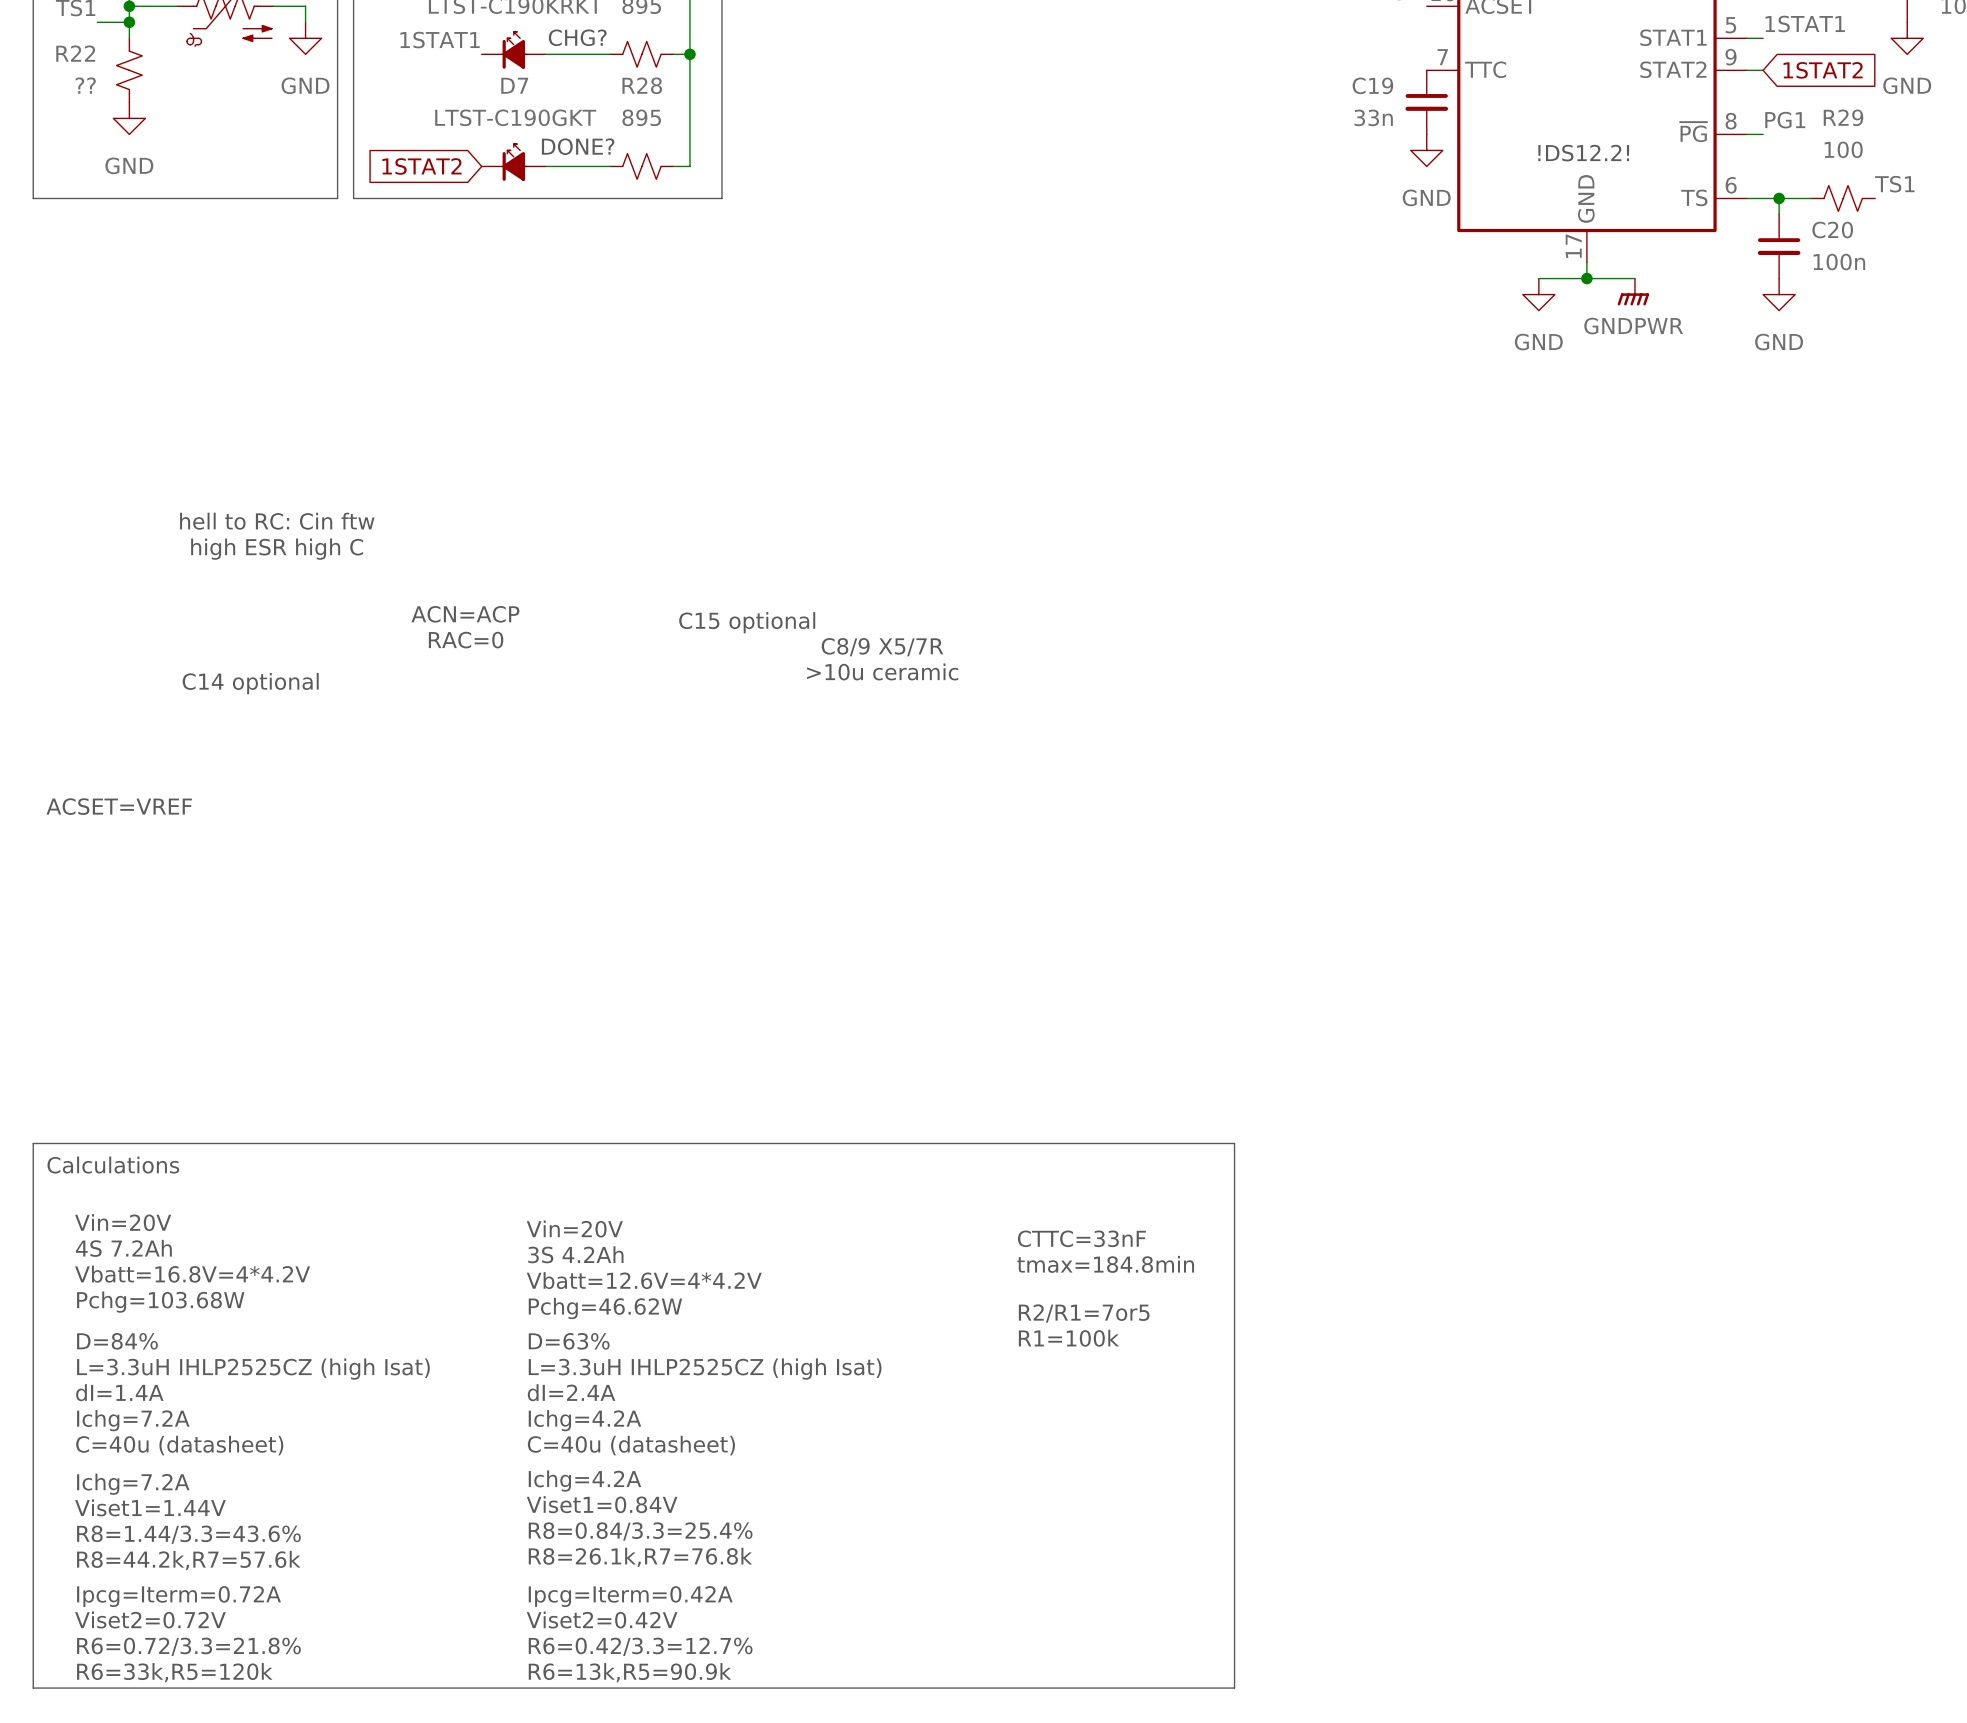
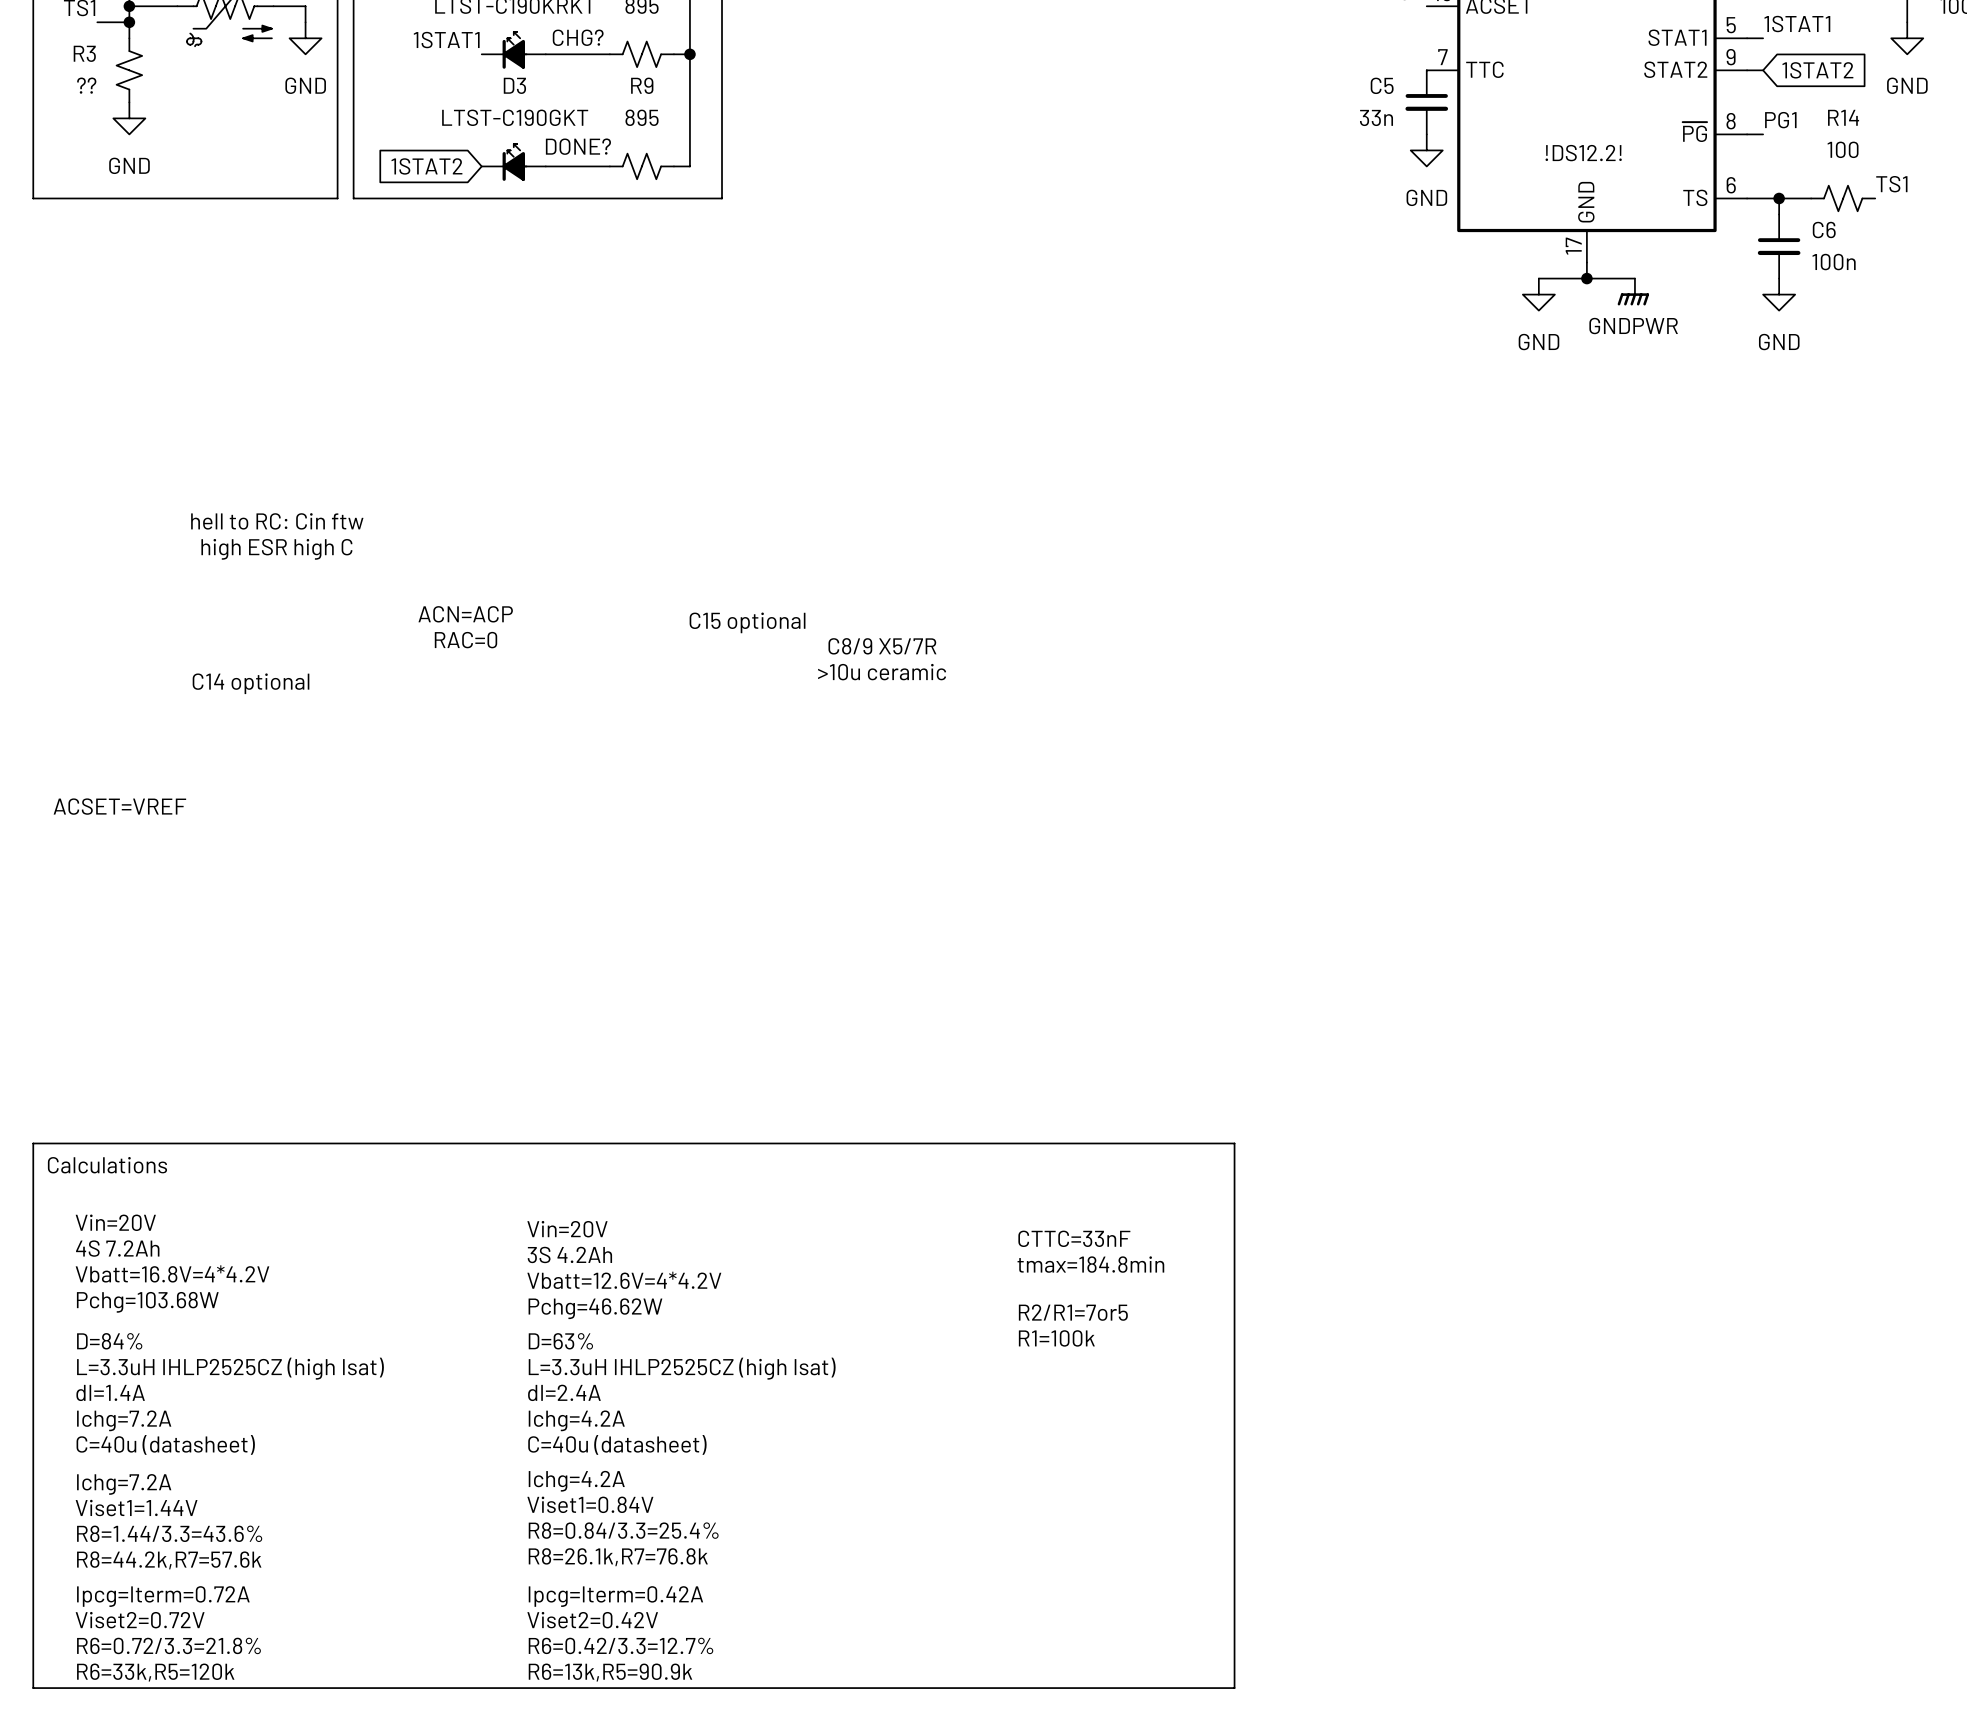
R22 name: R22 (75, 53) -> R3 (84, 53)
D7 name: D7 (514, 85) -> D3 (514, 85)
R28 name: R28 (642, 85) -> R9 (642, 85)
C19 name: C19 (1372, 85) -> C5 (1382, 85)
R29 name: R29 (1843, 117) -> R14 (1843, 117)
C20 name: C20 (1832, 230) -> C6 (1824, 230)

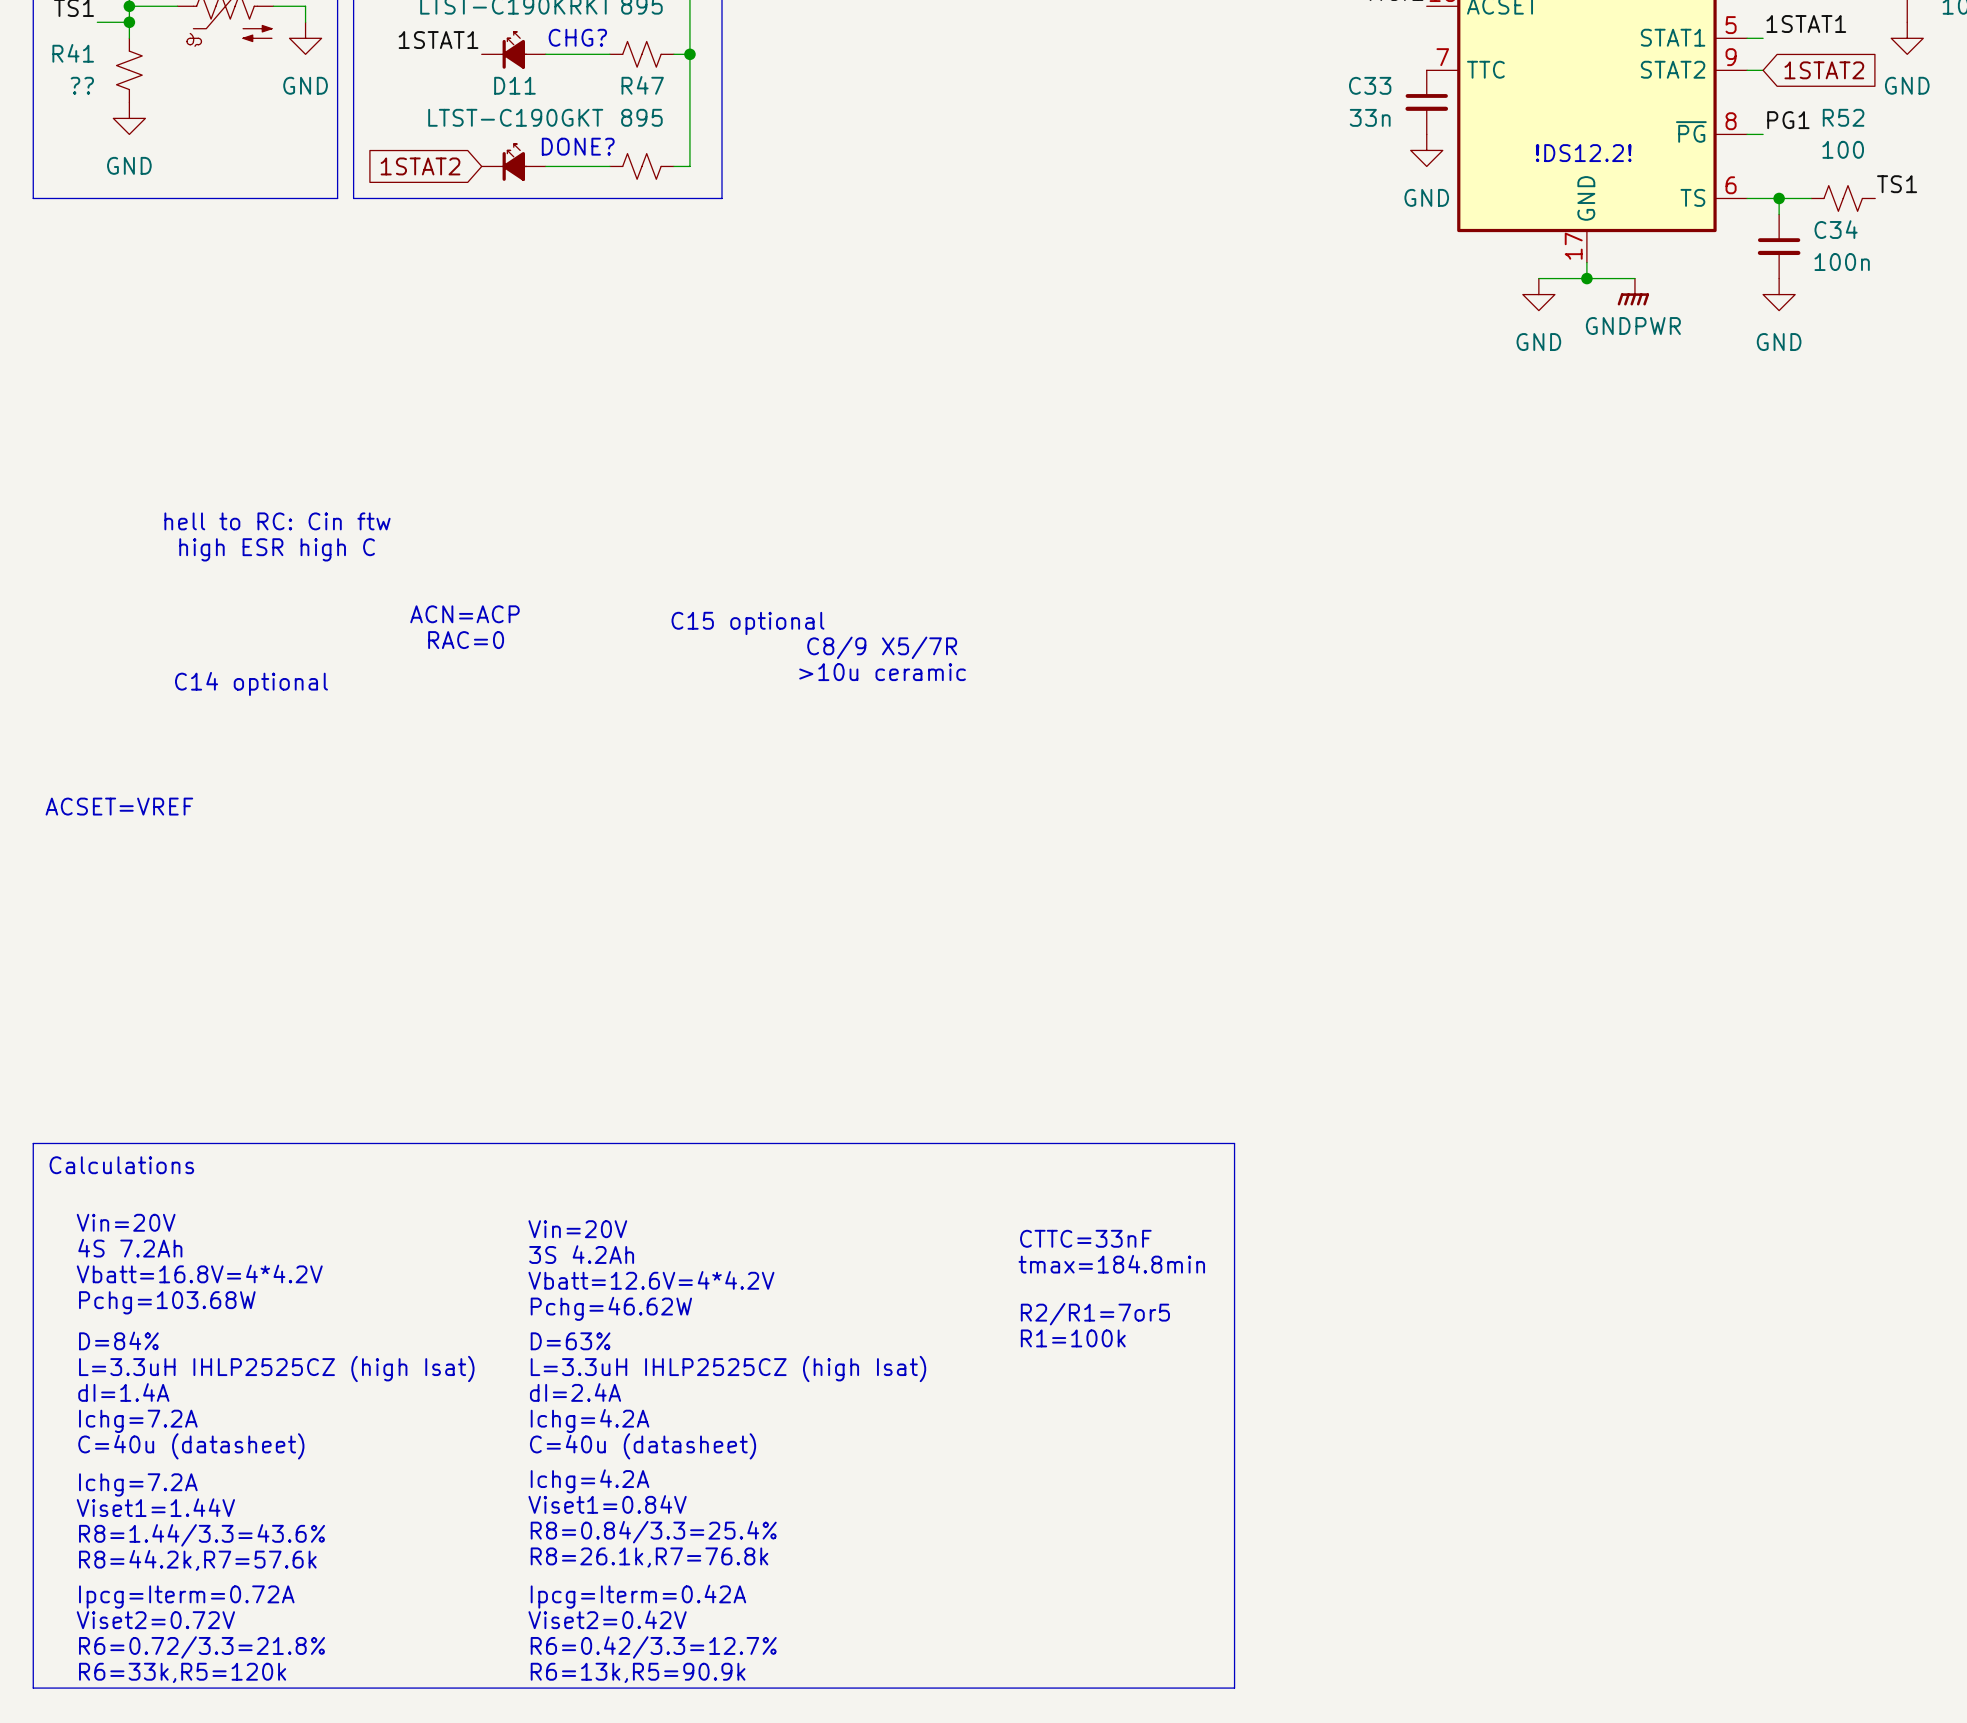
R3 name: R3 (84, 53) -> R41 (73, 53)
D3 name: D3 (514, 85) -> D11 (514, 85)
R9 name: R9 (642, 85) -> R47 (642, 85)
C5 name: C5 (1382, 85) -> C33 (1370, 85)
R14 name: R14 (1843, 117) -> R52 (1843, 117)
C6 name: C6 (1824, 230) -> C34 (1836, 229)

